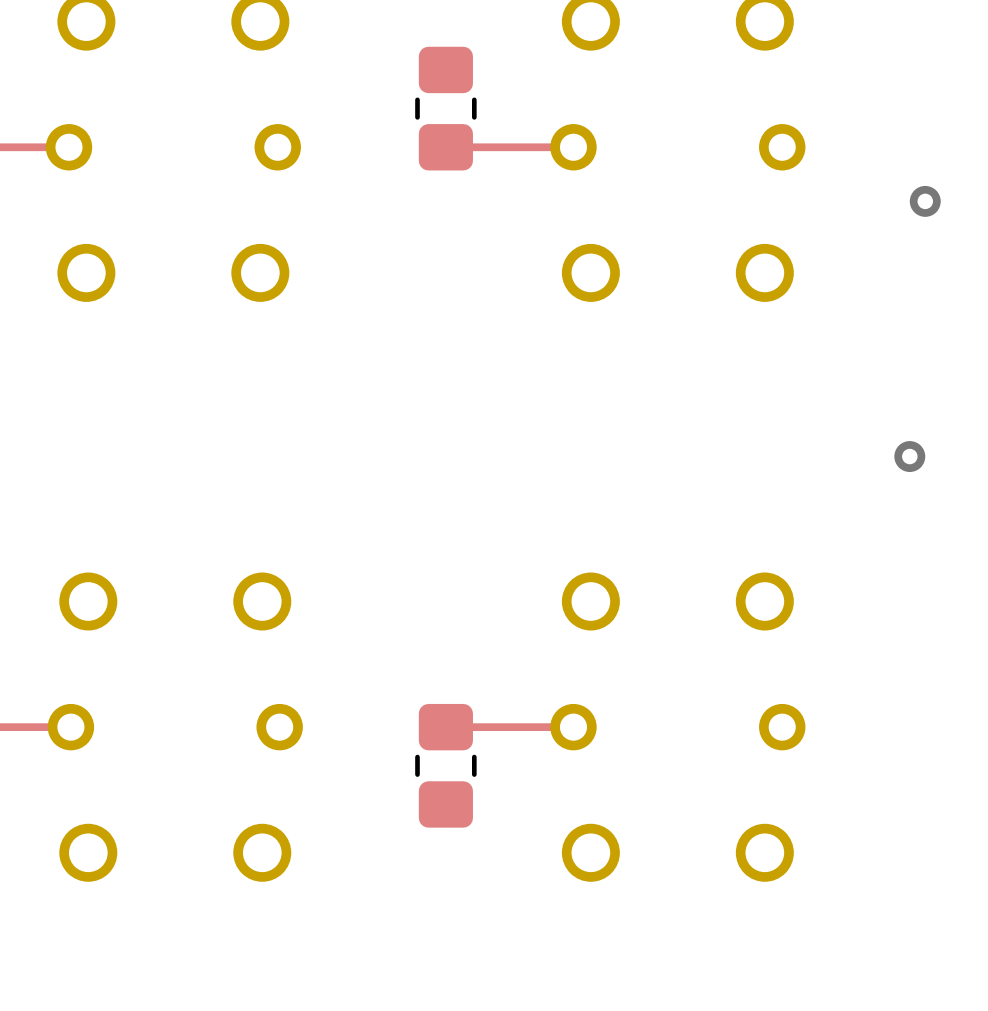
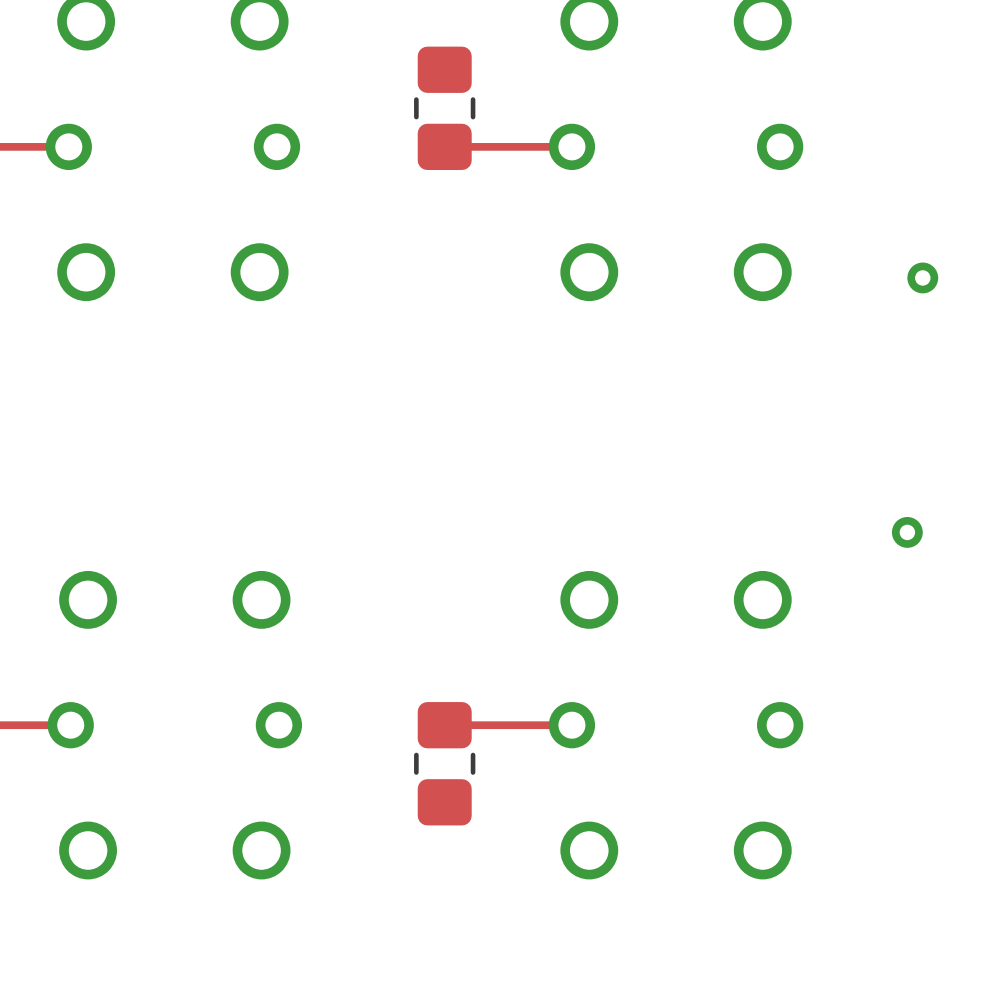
via position: (925, 201) -> (922, 277)
via position: (909, 456) -> (907, 532)

